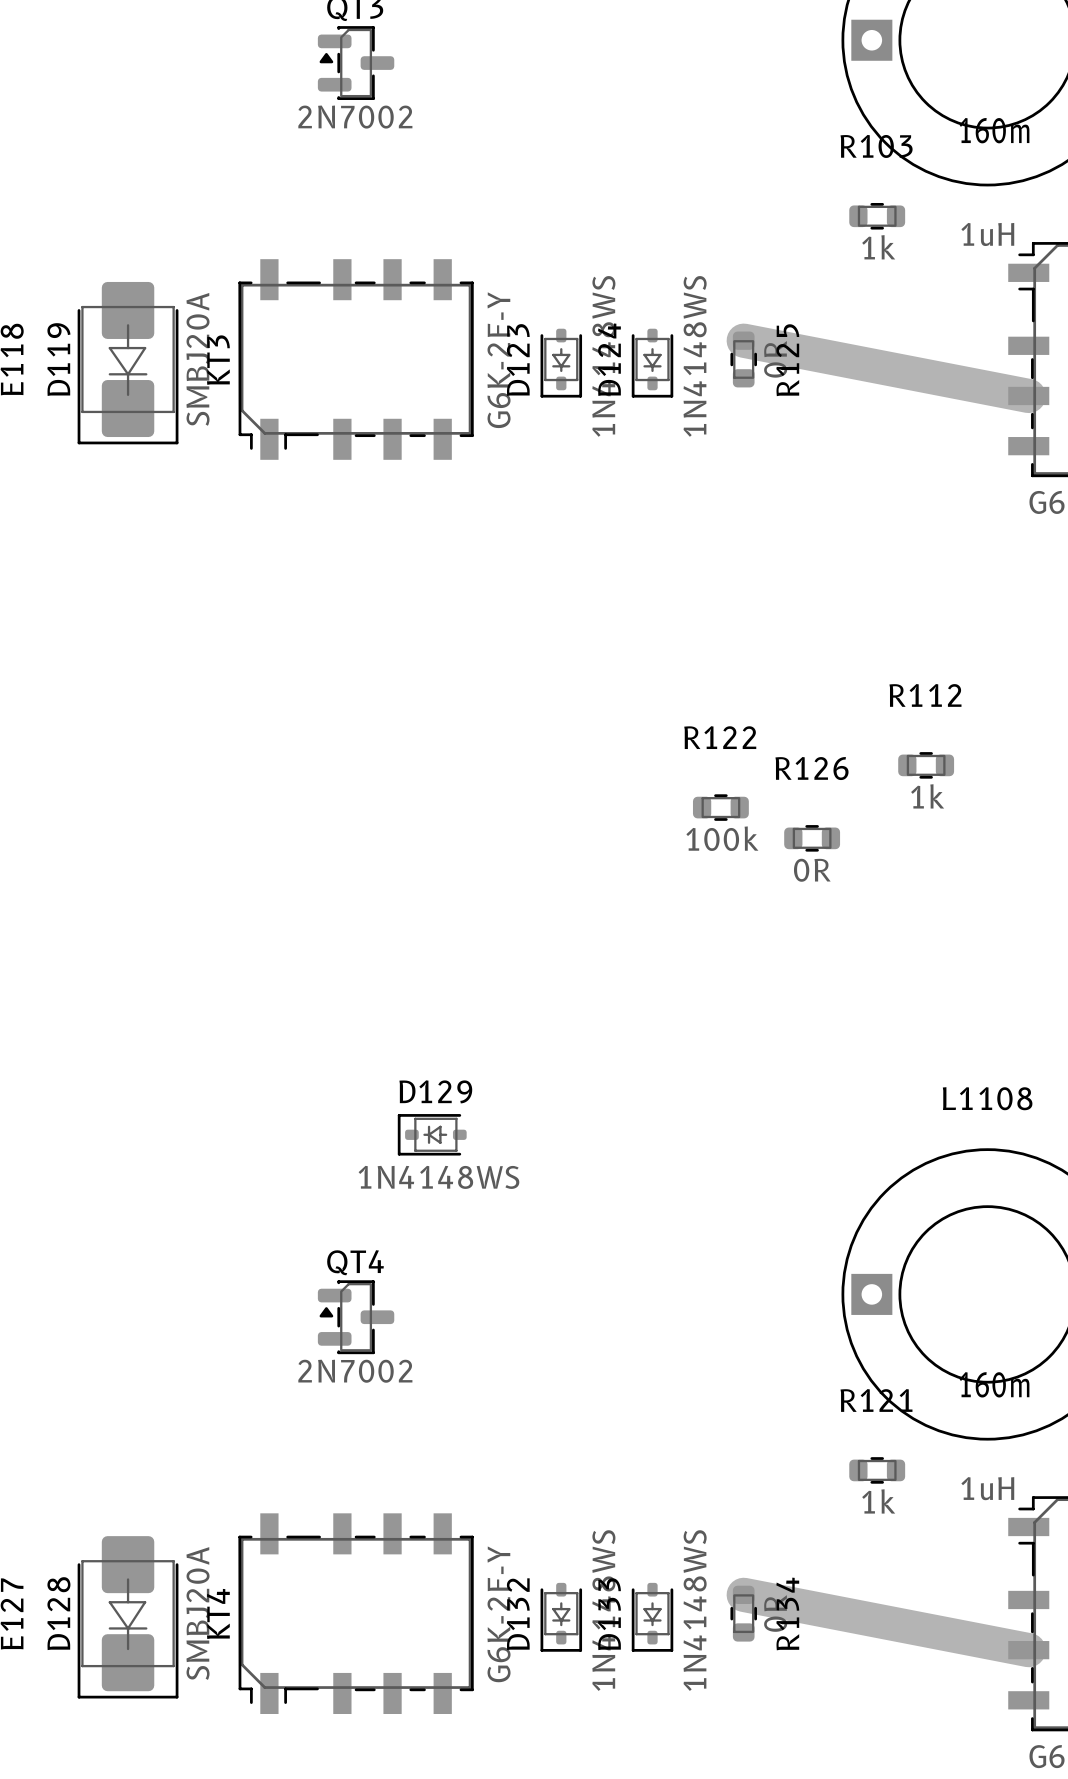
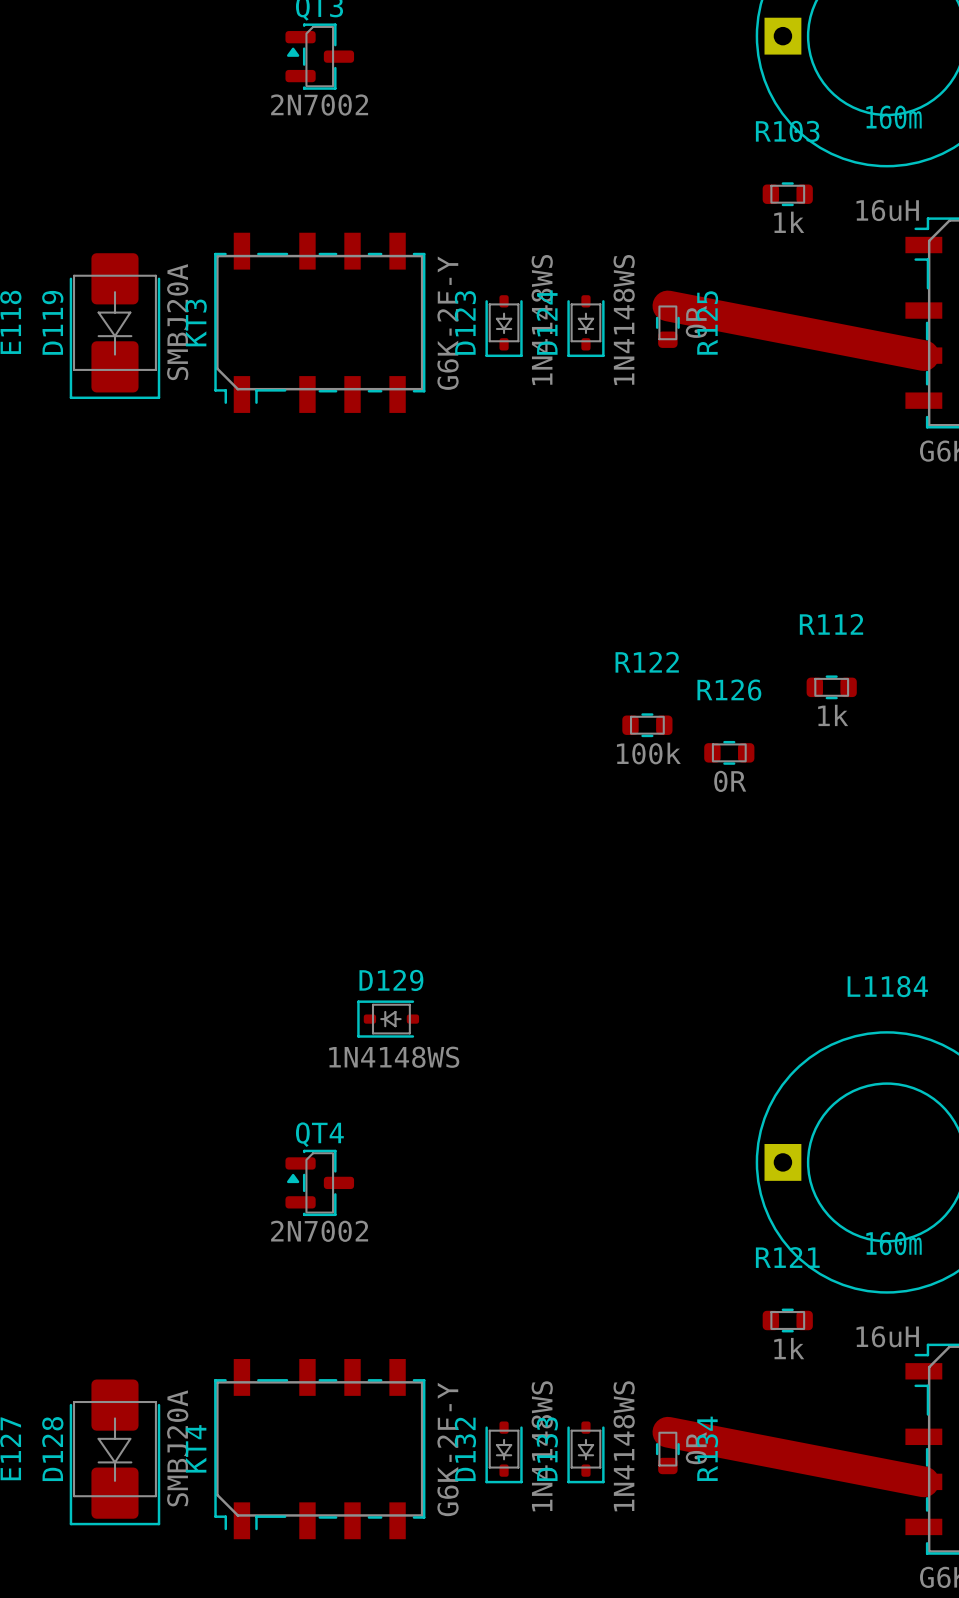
part value: 1uH (987, 234) -> 16uH (887, 210)
L1108 name: L1108 (987, 1098) -> L1184 (887, 986)
L1108 value: 1uH (987, 1488) -> 16uH (887, 1336)

